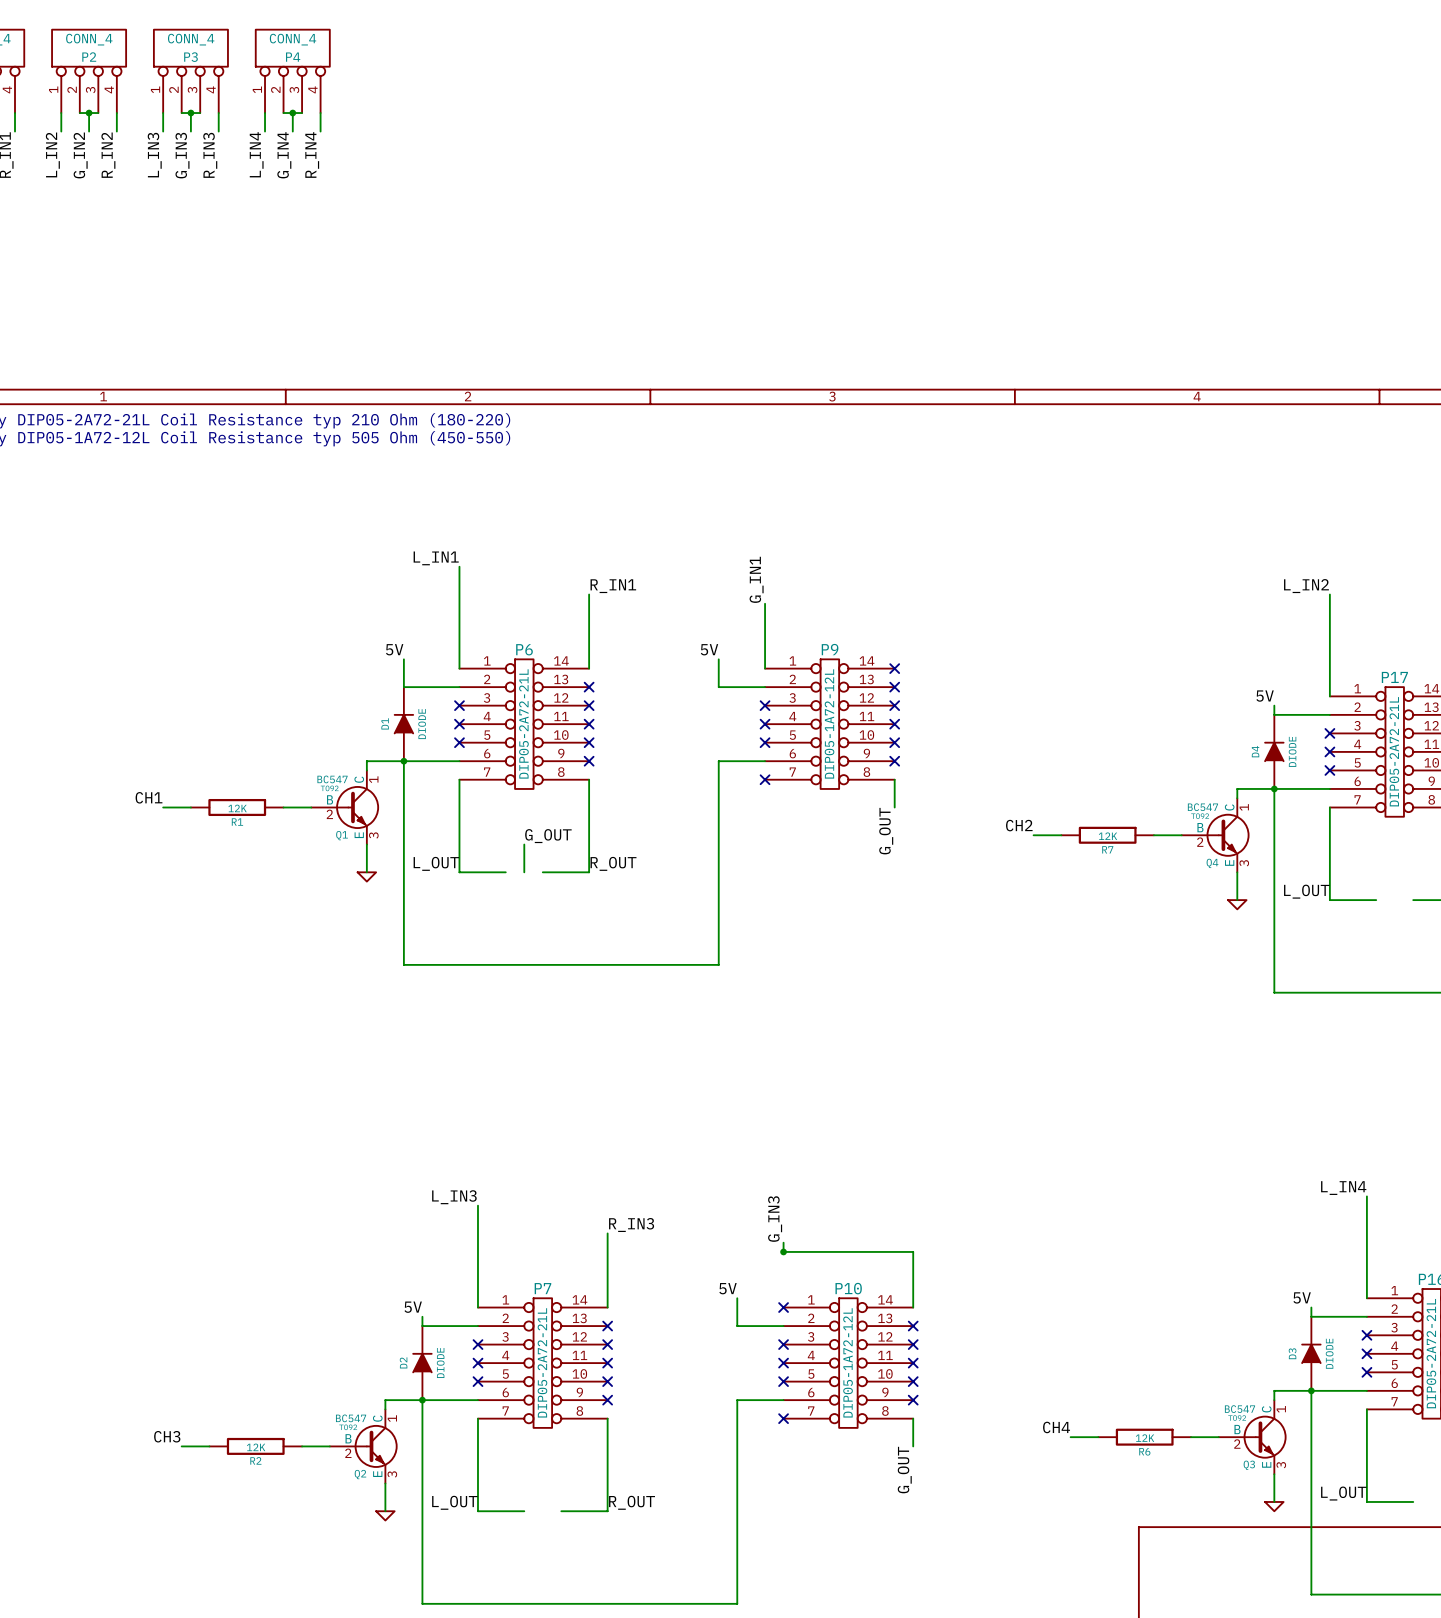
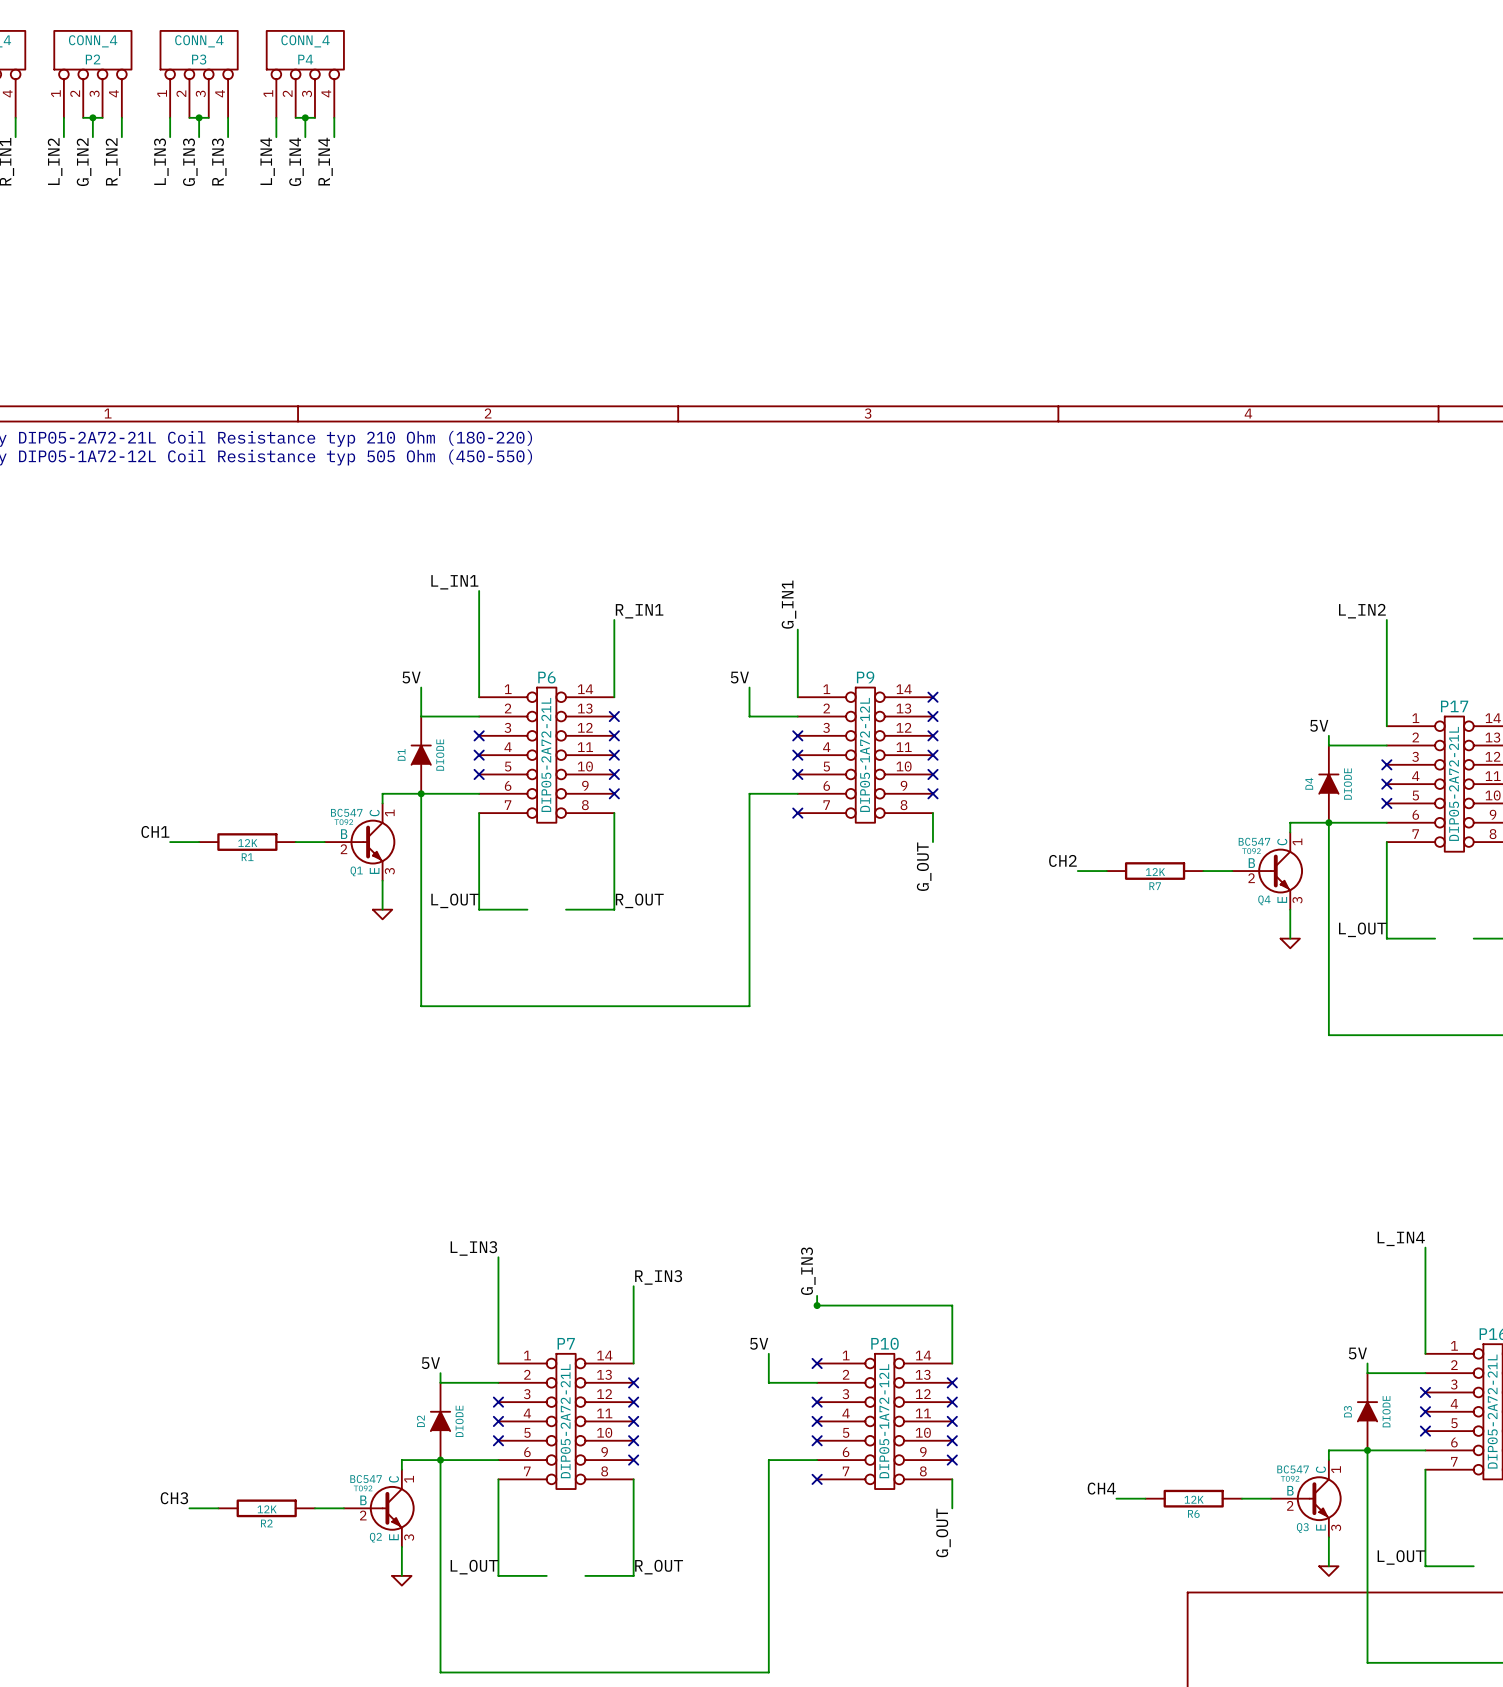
label: G_OUT (548, 836) -> none
wire: (524, 844) (524, 872) -> none

